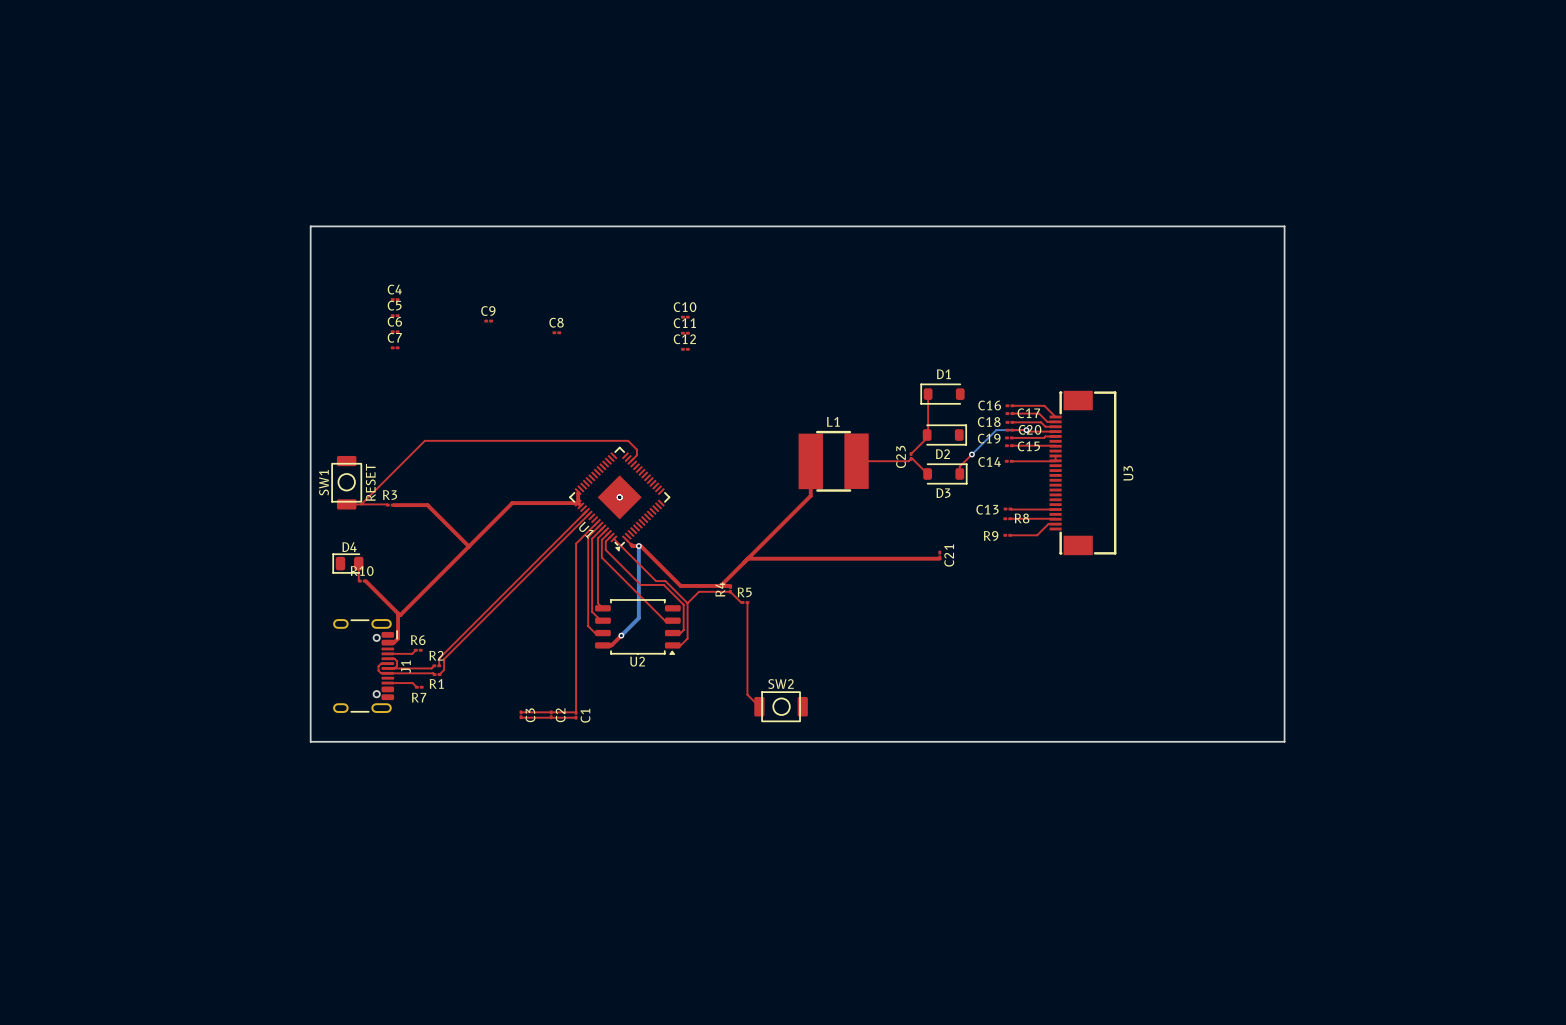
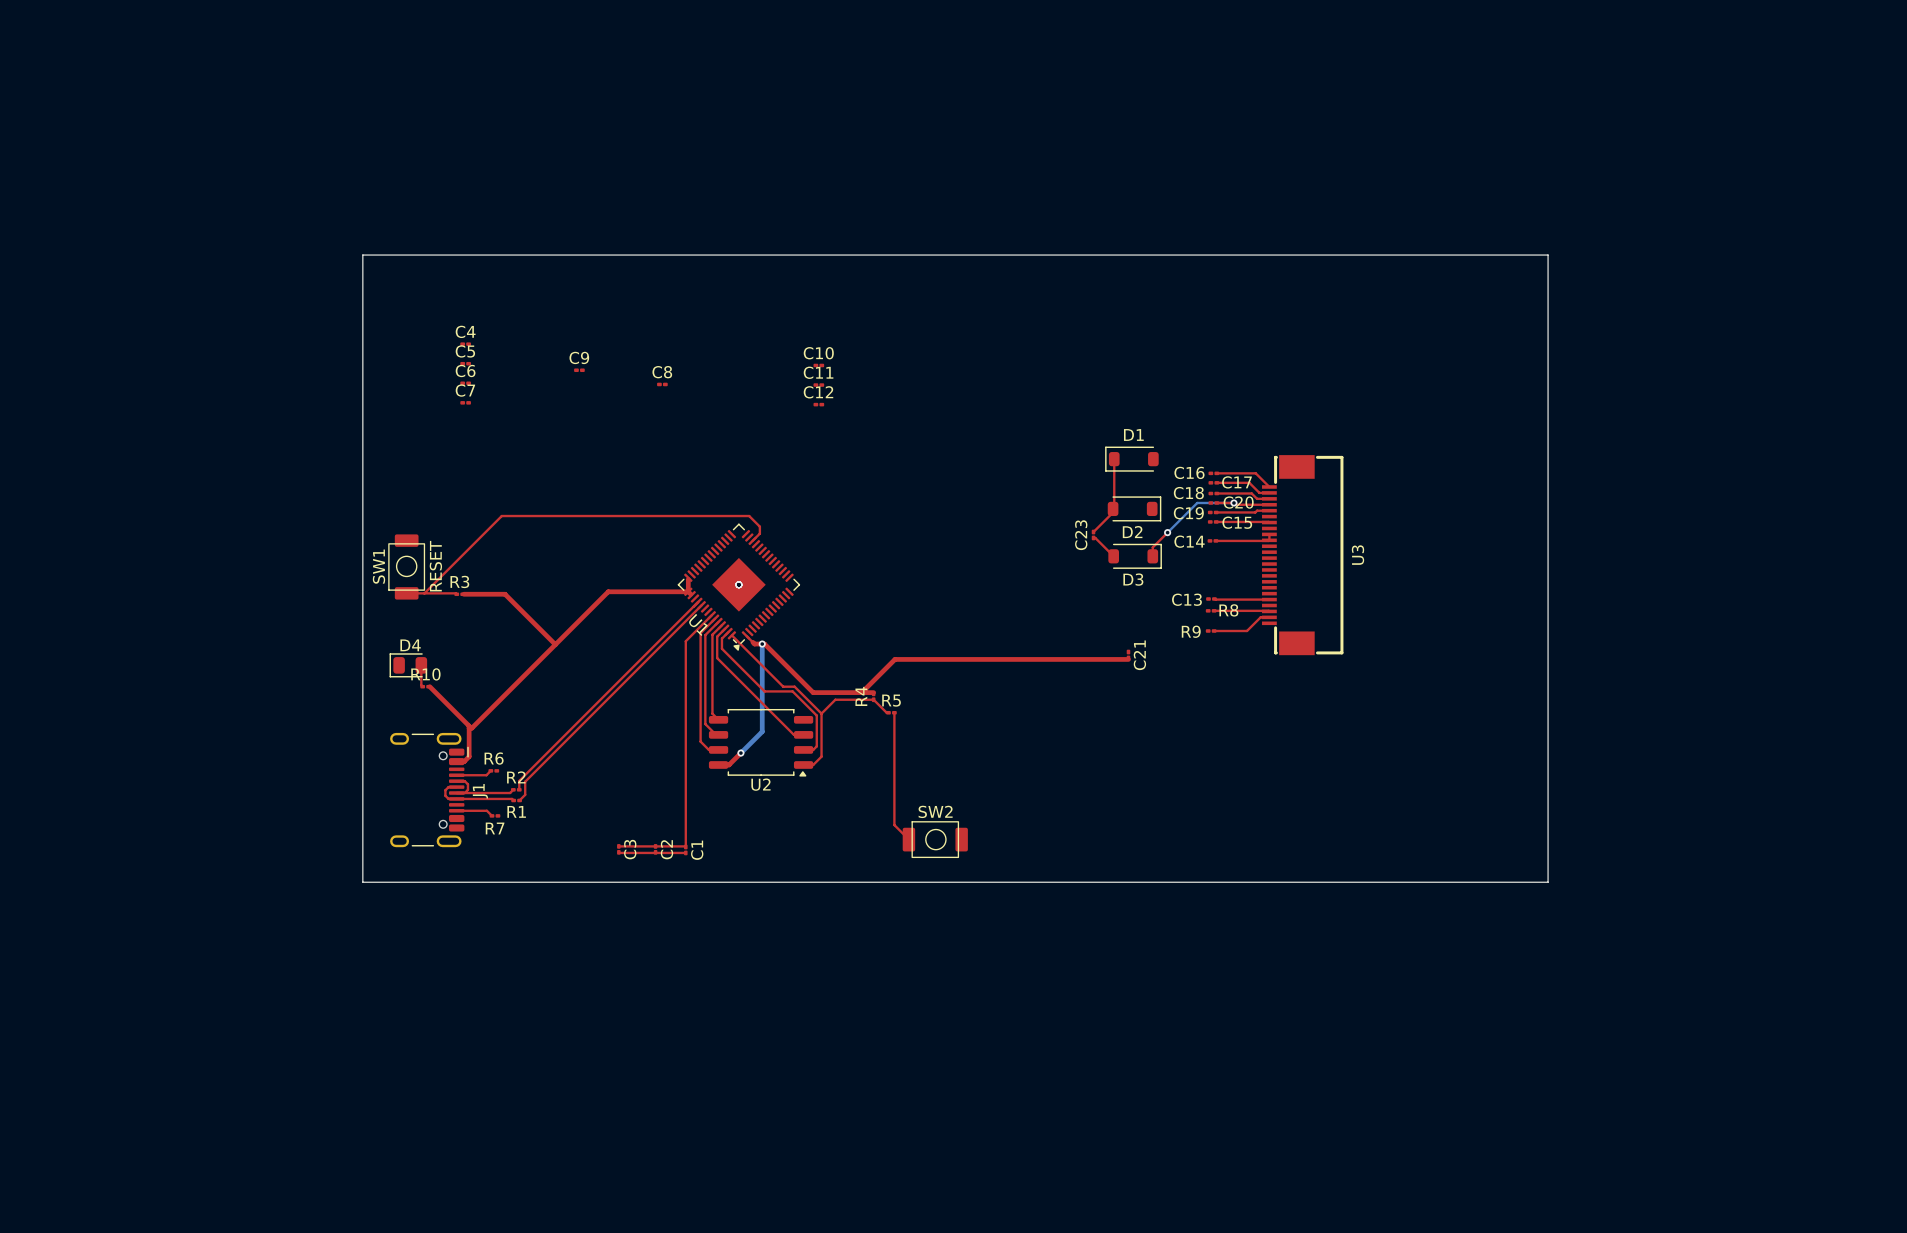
top track: (911, 458) (908, 461) (856, 461) -> none
top track: (810, 461) (810, 495) (747, 558) -> none
L1: (833, 461) -> none

